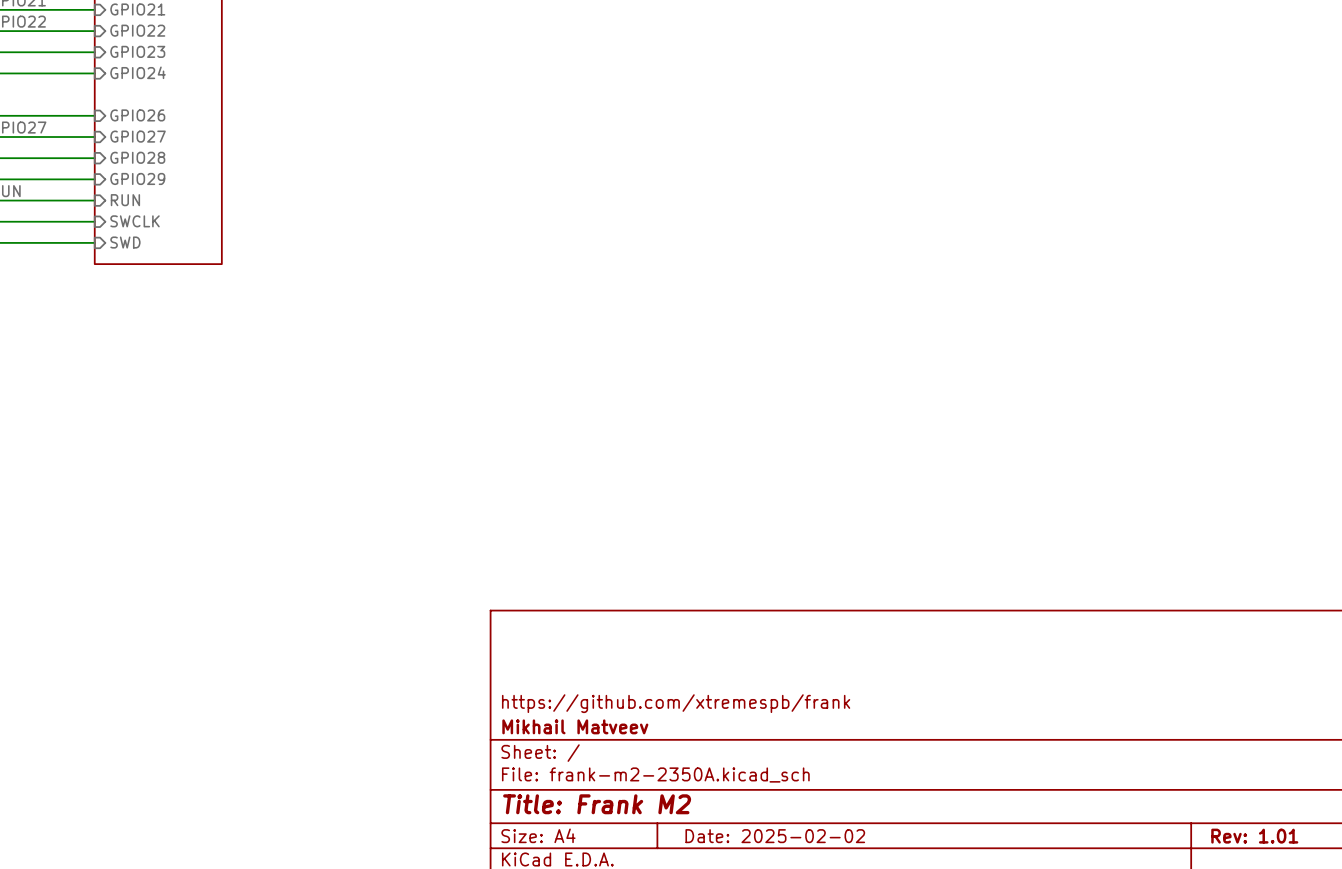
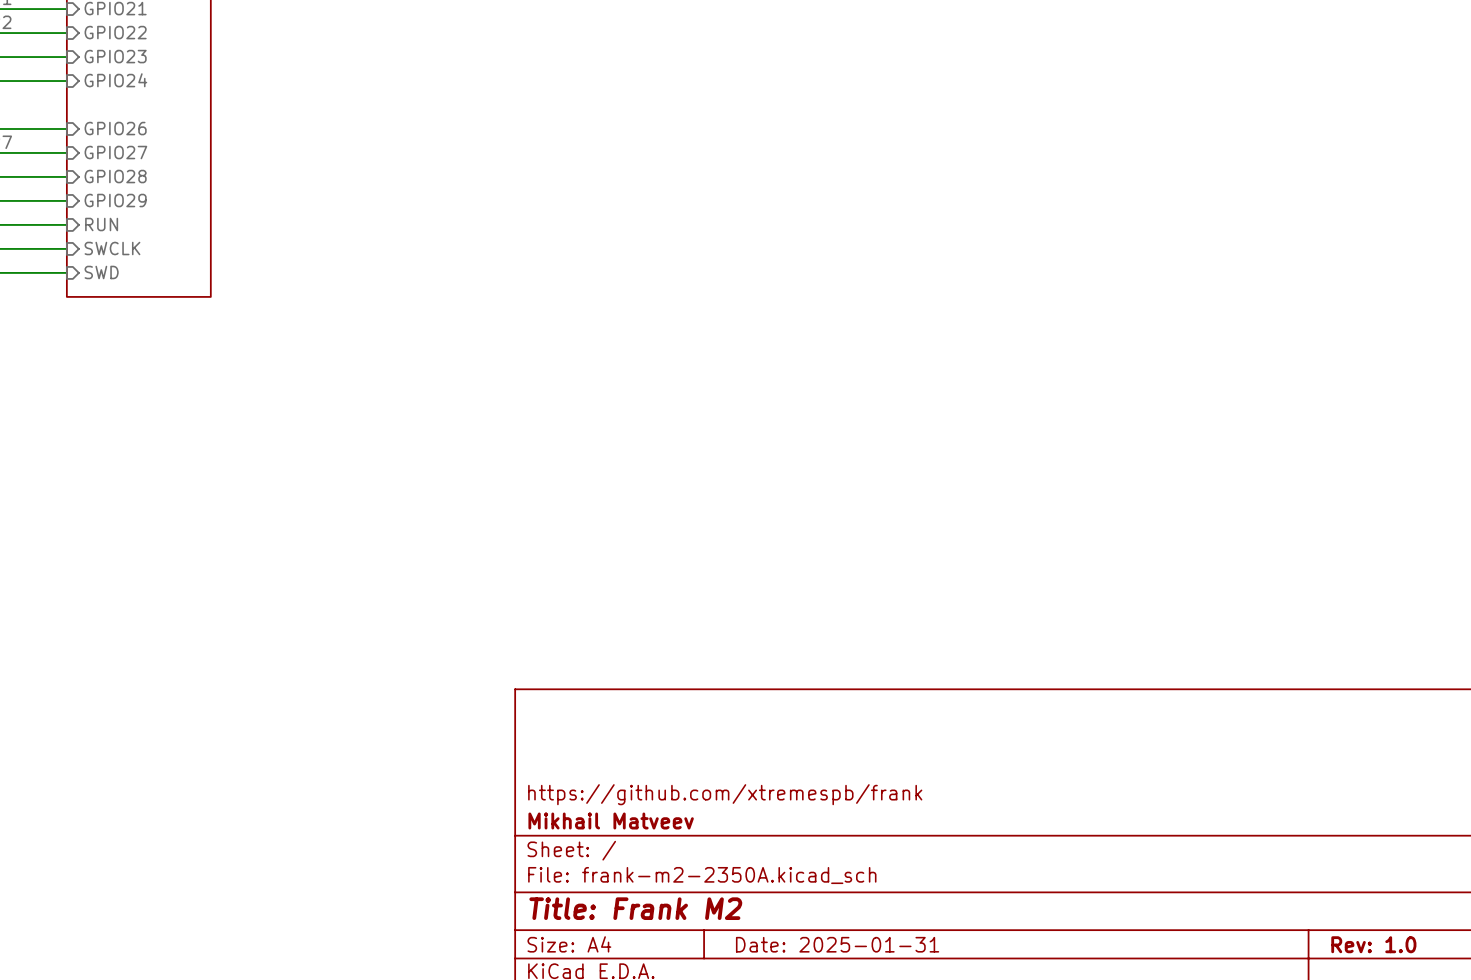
title block: Date: 2025-02-02 (775, 836) -> Date: 2025-01-31 (837, 944)
title block: Rev: 1.01 (1254, 836) -> Rev: 1.0 (1373, 944)

